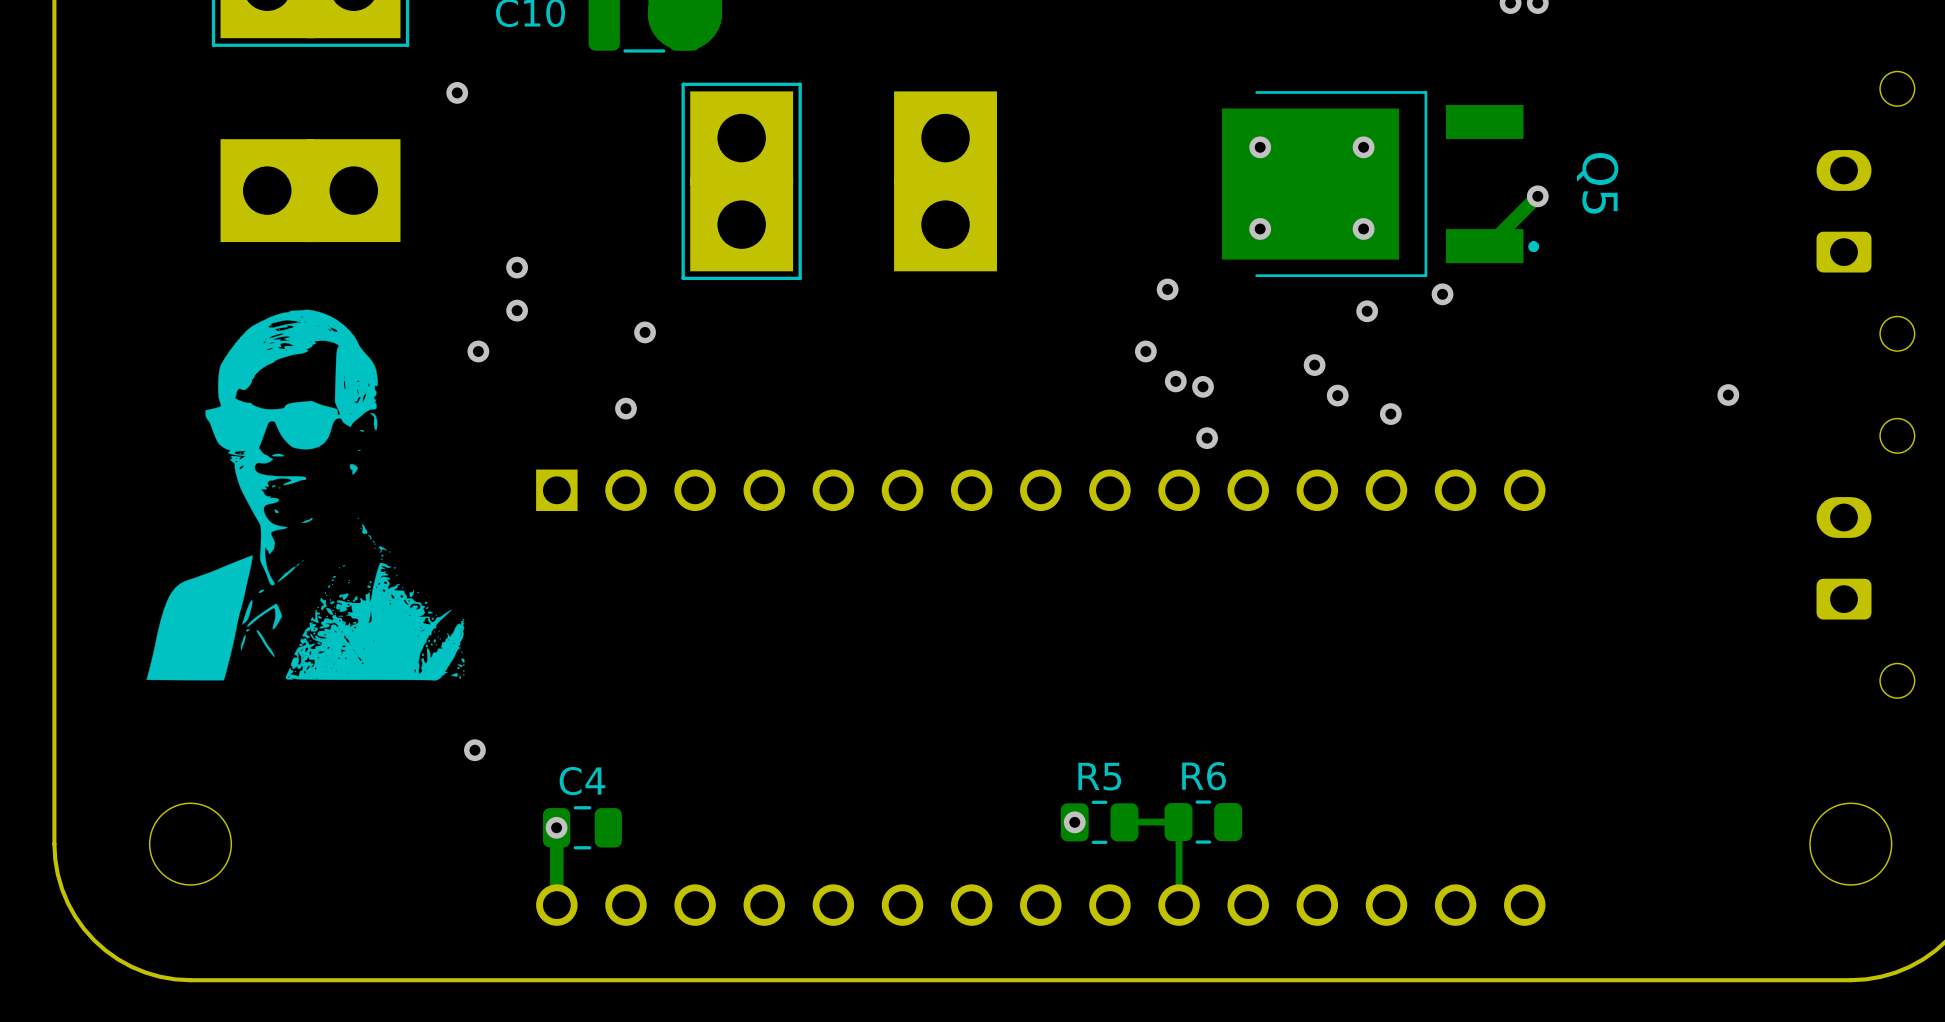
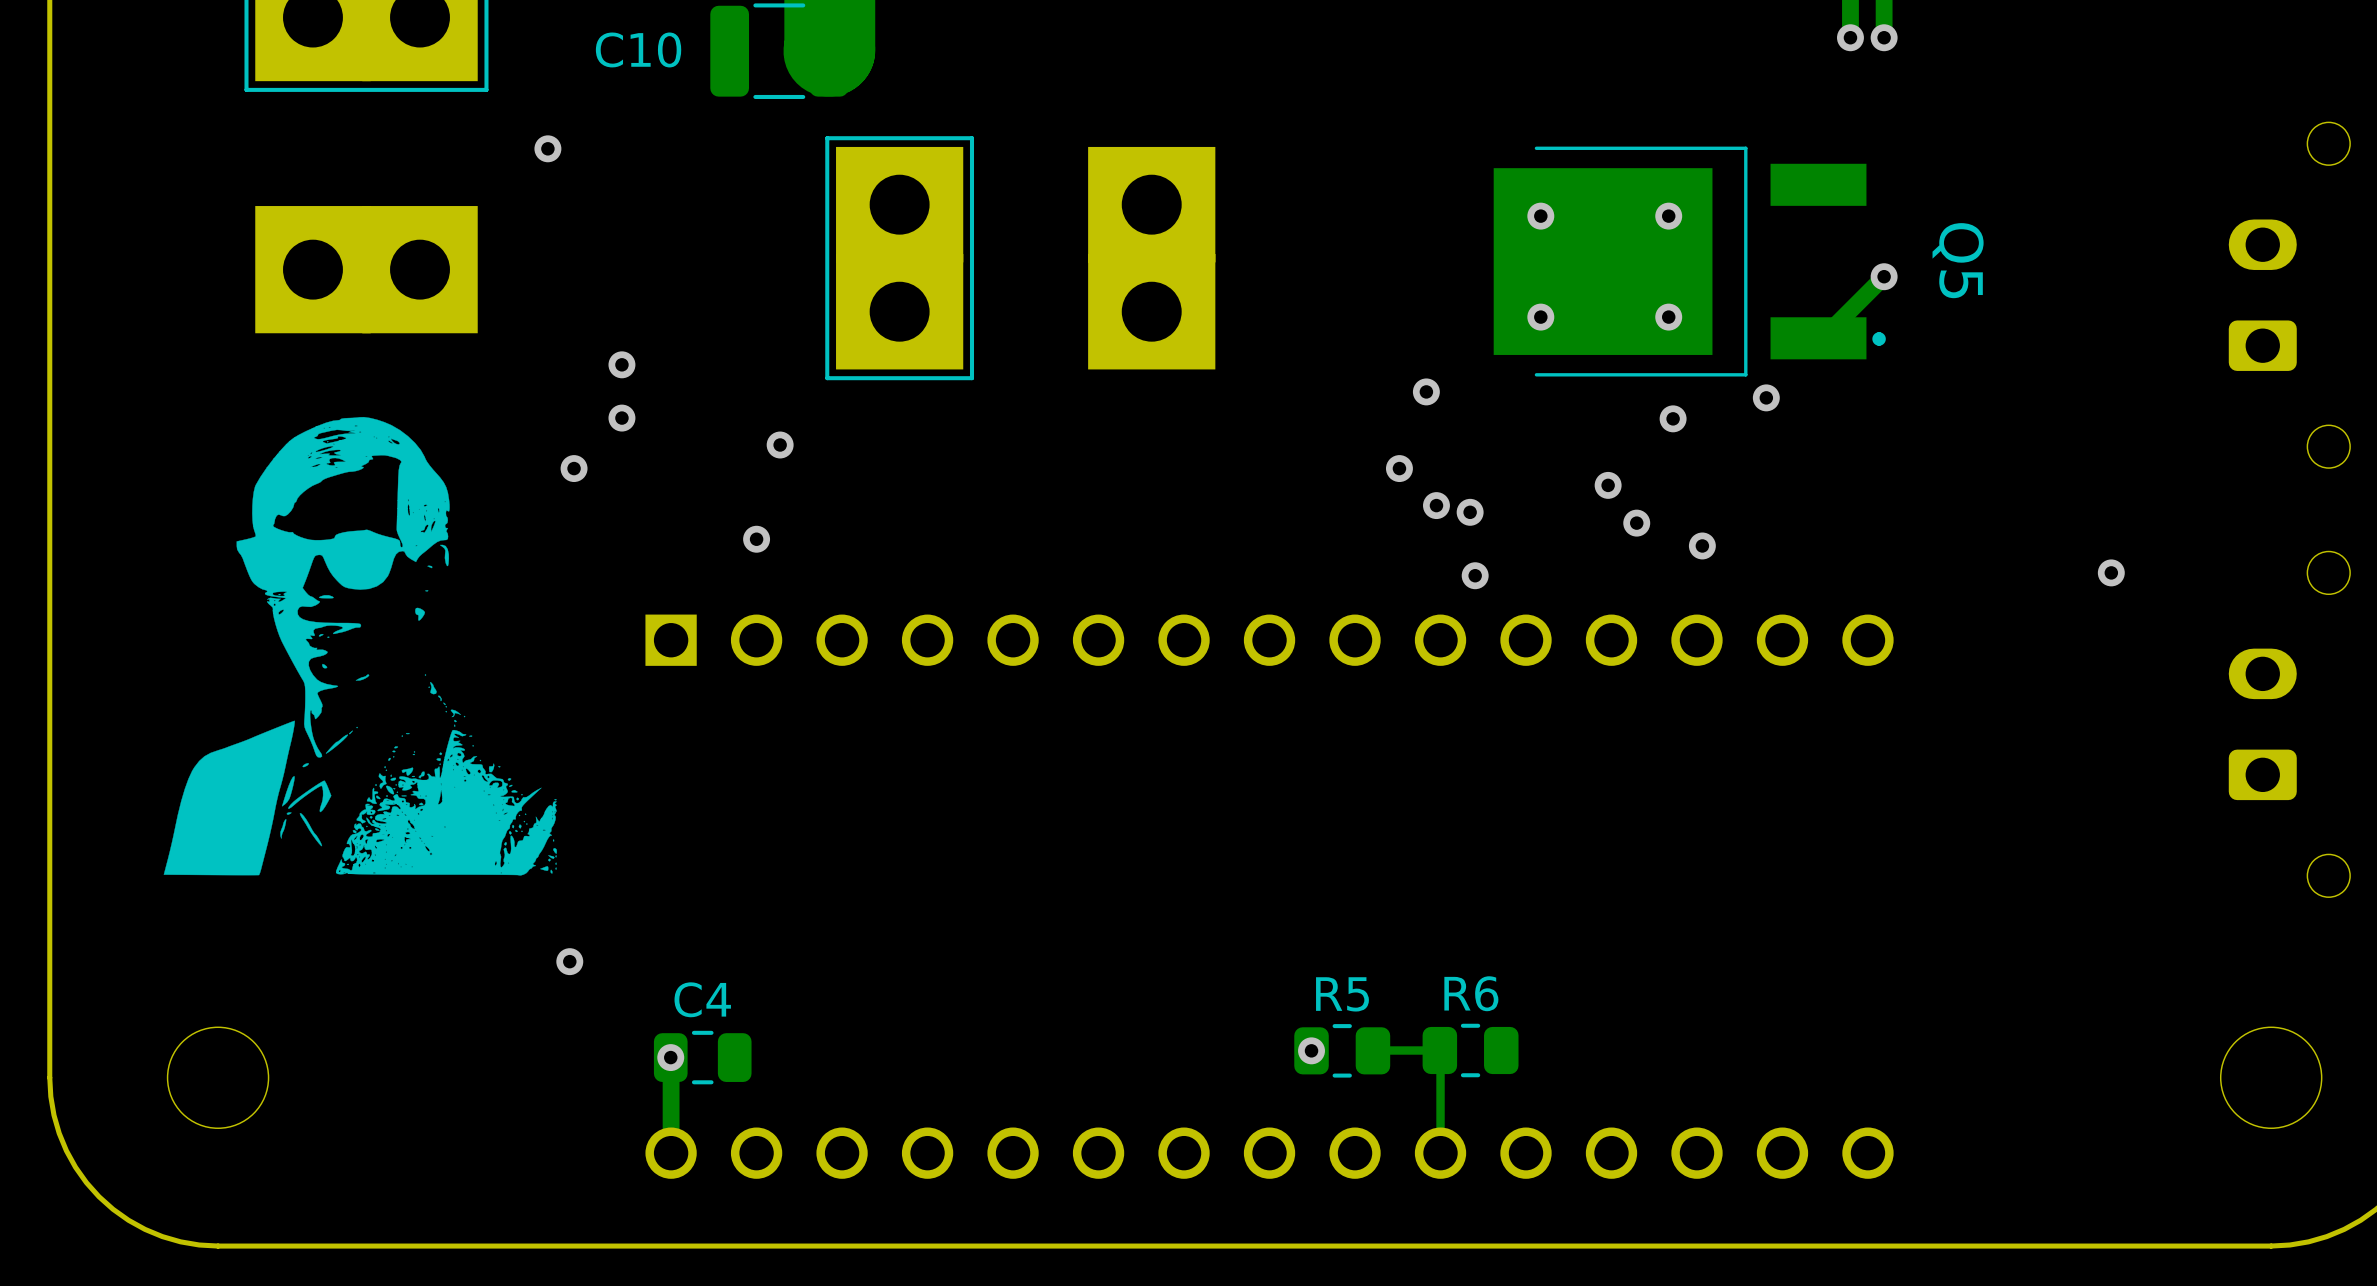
via position: (1728, 395) -> (2111, 572)

